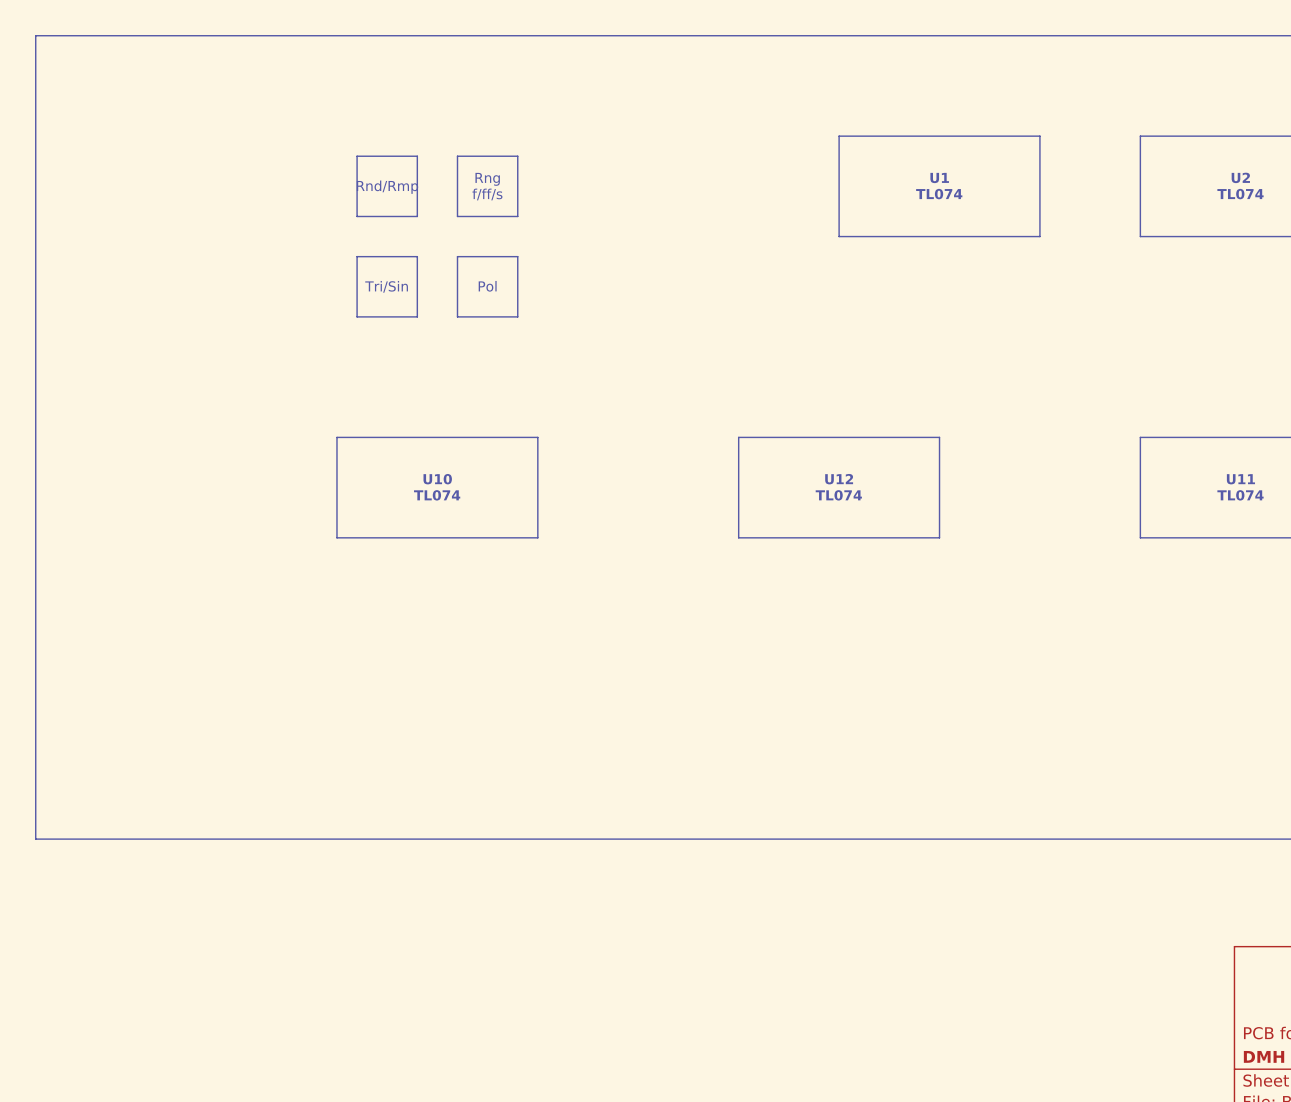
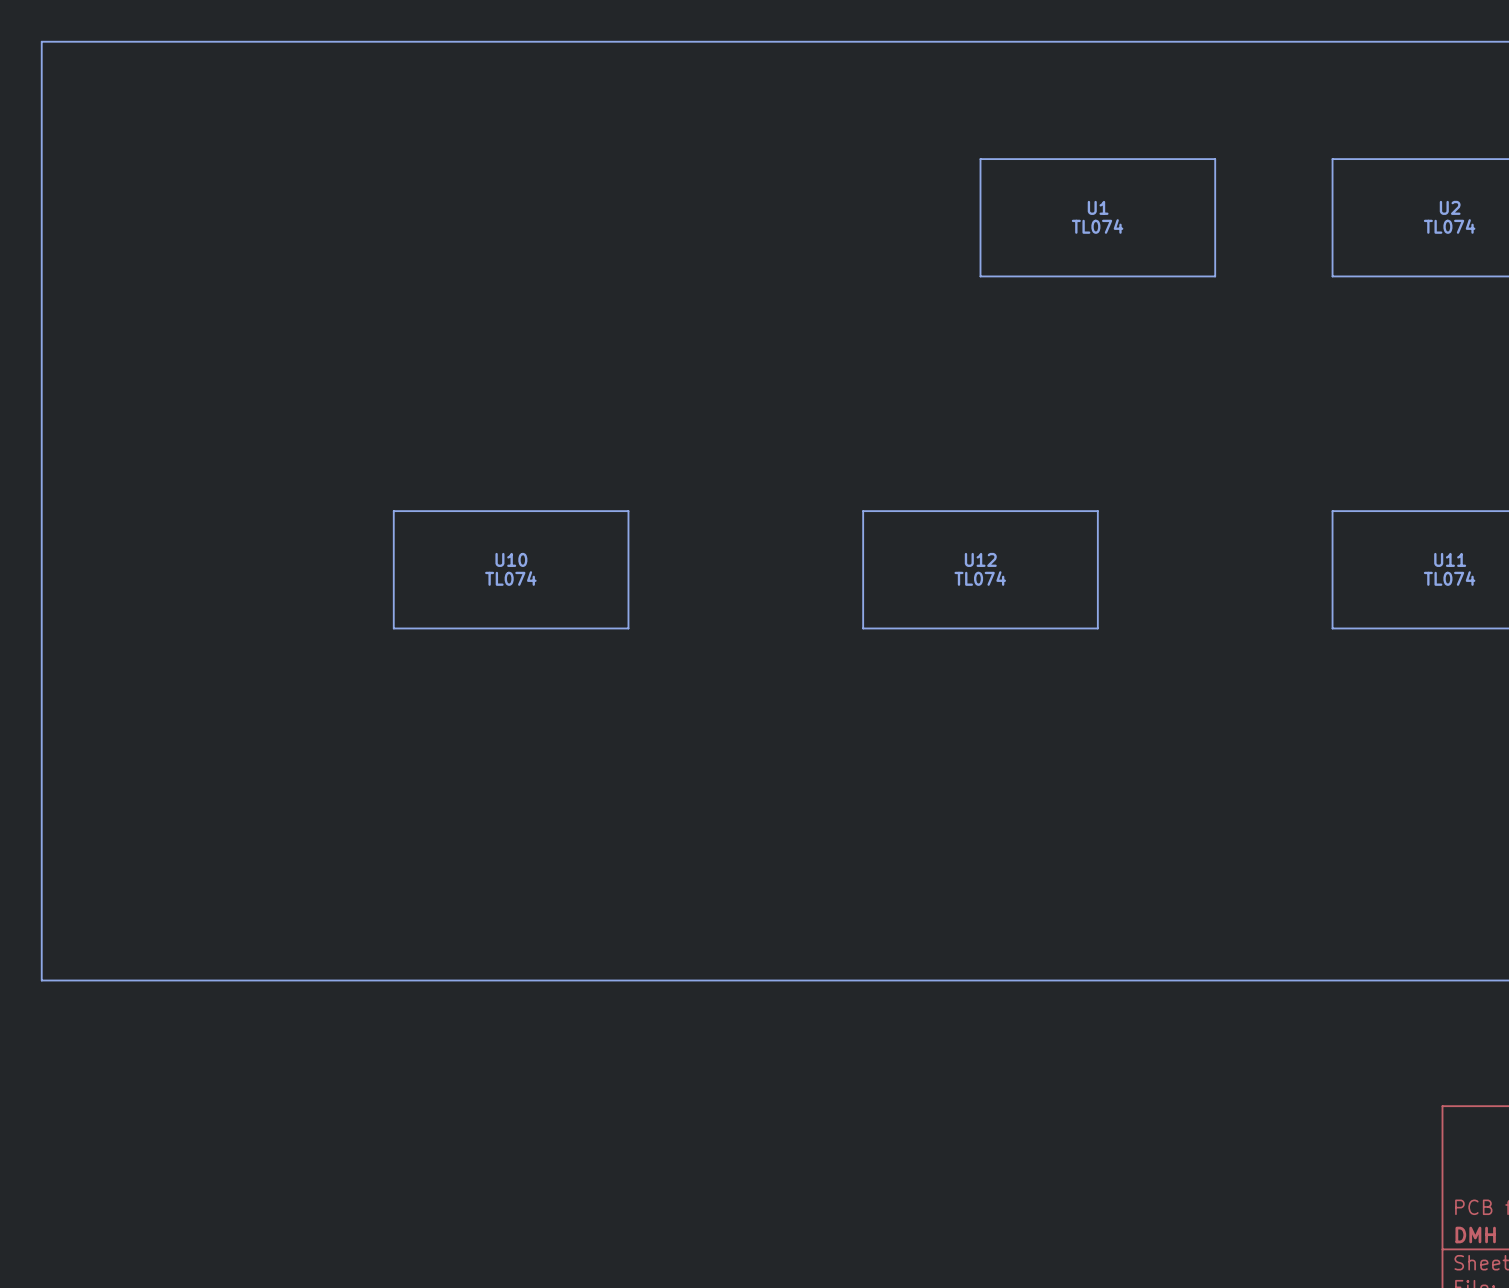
line: (357, 156) (357, 216) (417, 216) (417, 156) (357, 156) -> none
line: (457, 156) (517, 156) (517, 216) (457, 216) (457, 156) -> none
text: Rng (487, 179) -> none
text: Rnd/Rmp (387, 187) -> none
text: f/ff/s (487, 194) -> none
line: (357, 256) (417, 256) (417, 316) (357, 316) (357, 256) -> none
line: (457, 256) (517, 256) (517, 316) (457, 316) (457, 256) -> none
text: Tri/Sin (386, 286) -> none
text: Pol (487, 286) -> none

